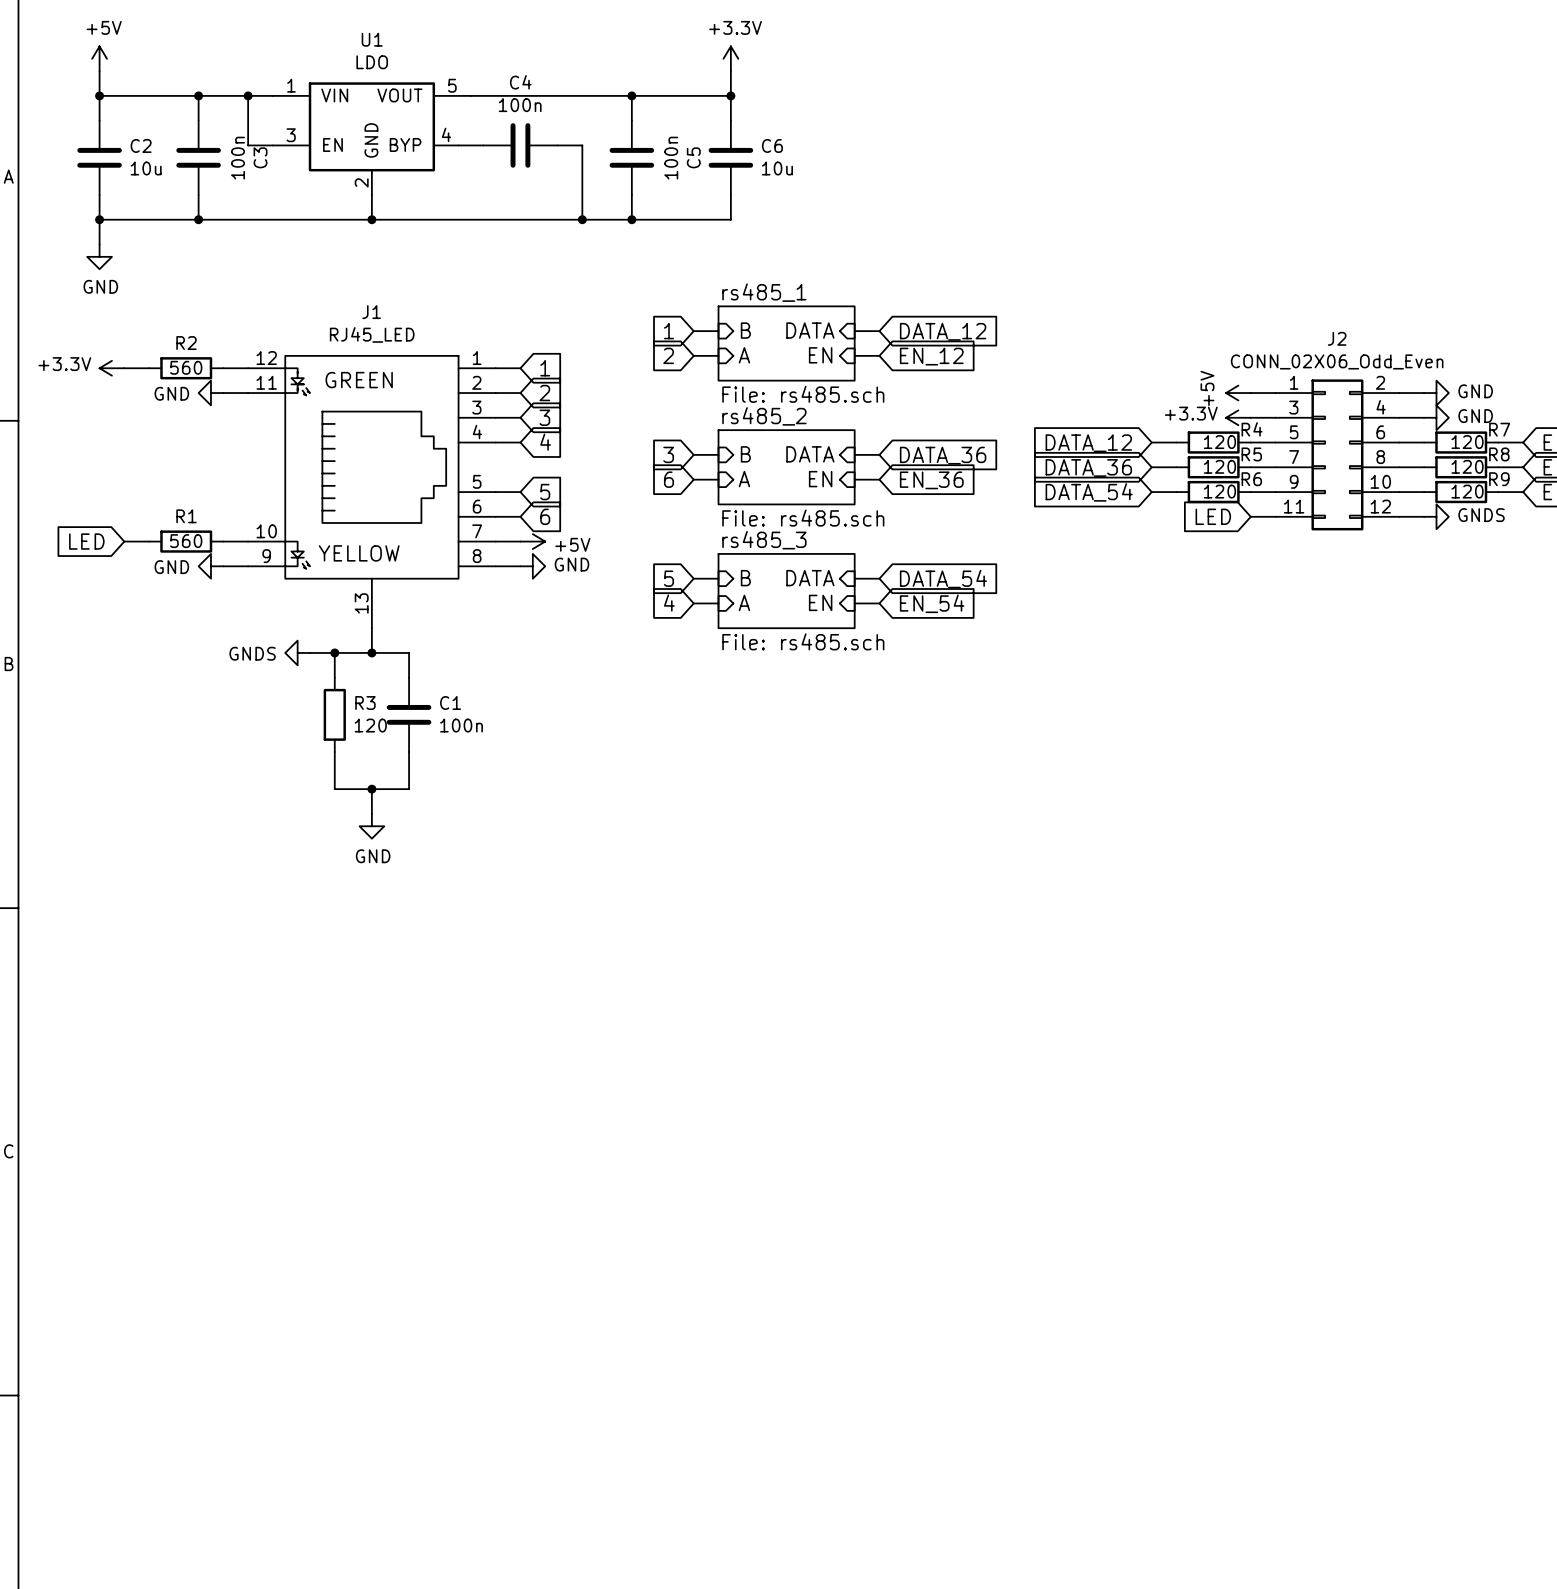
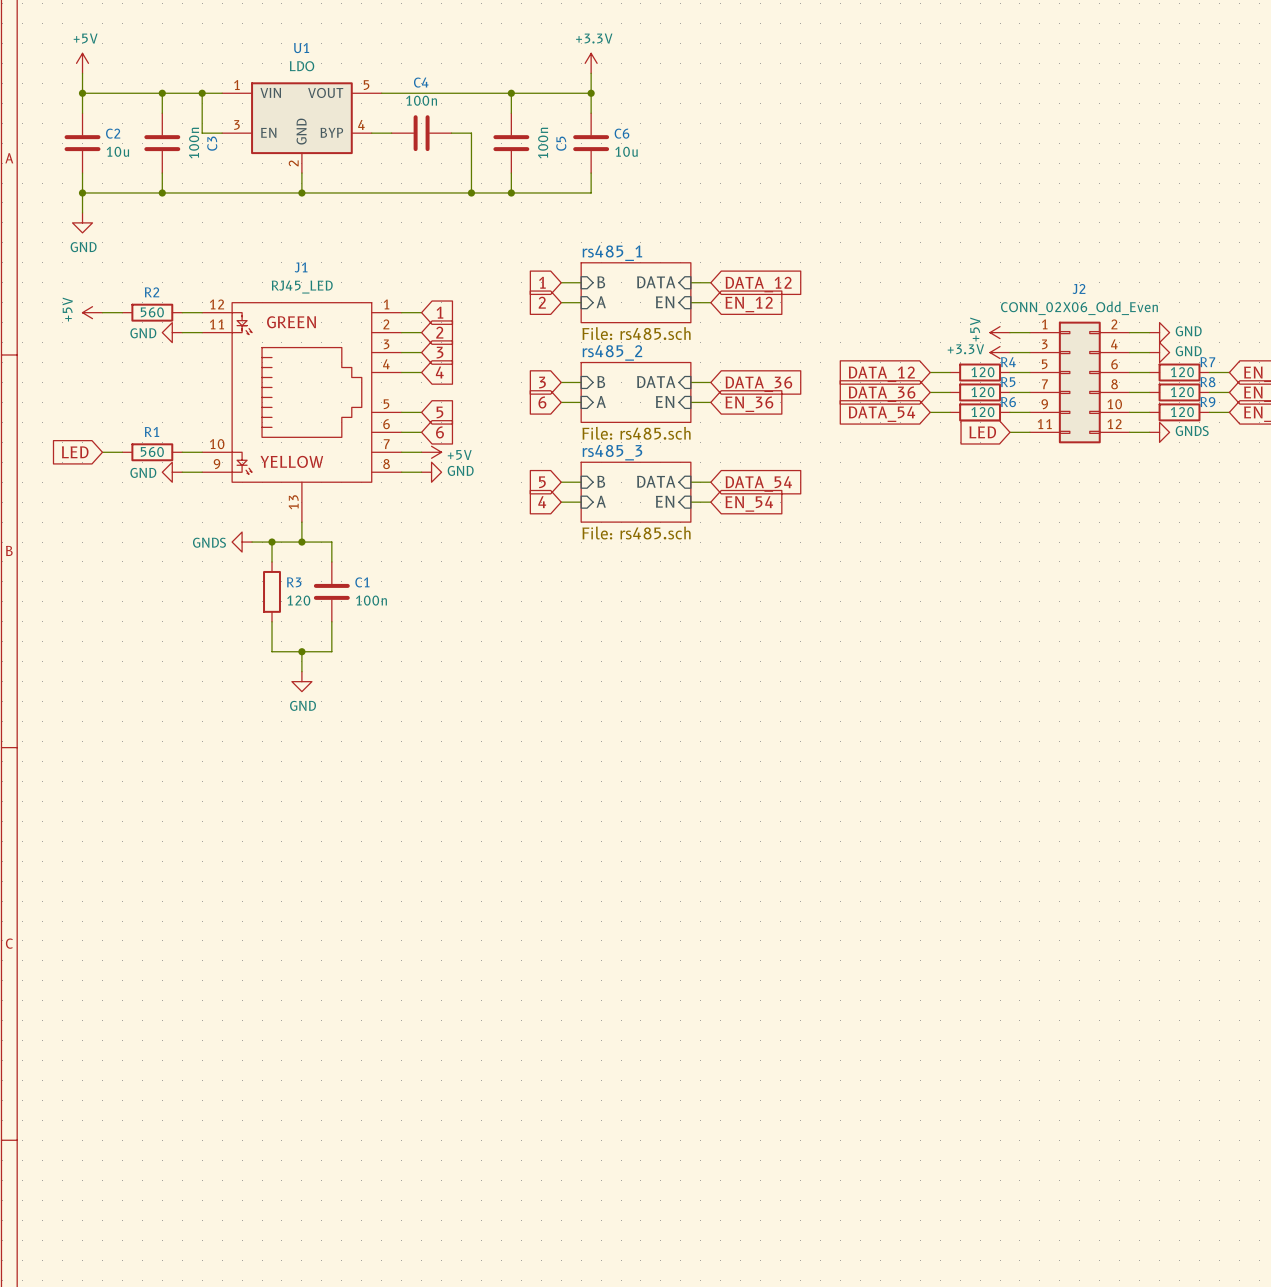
power symbol: +3.3V (111, 368) -> +5V (92, 312)

